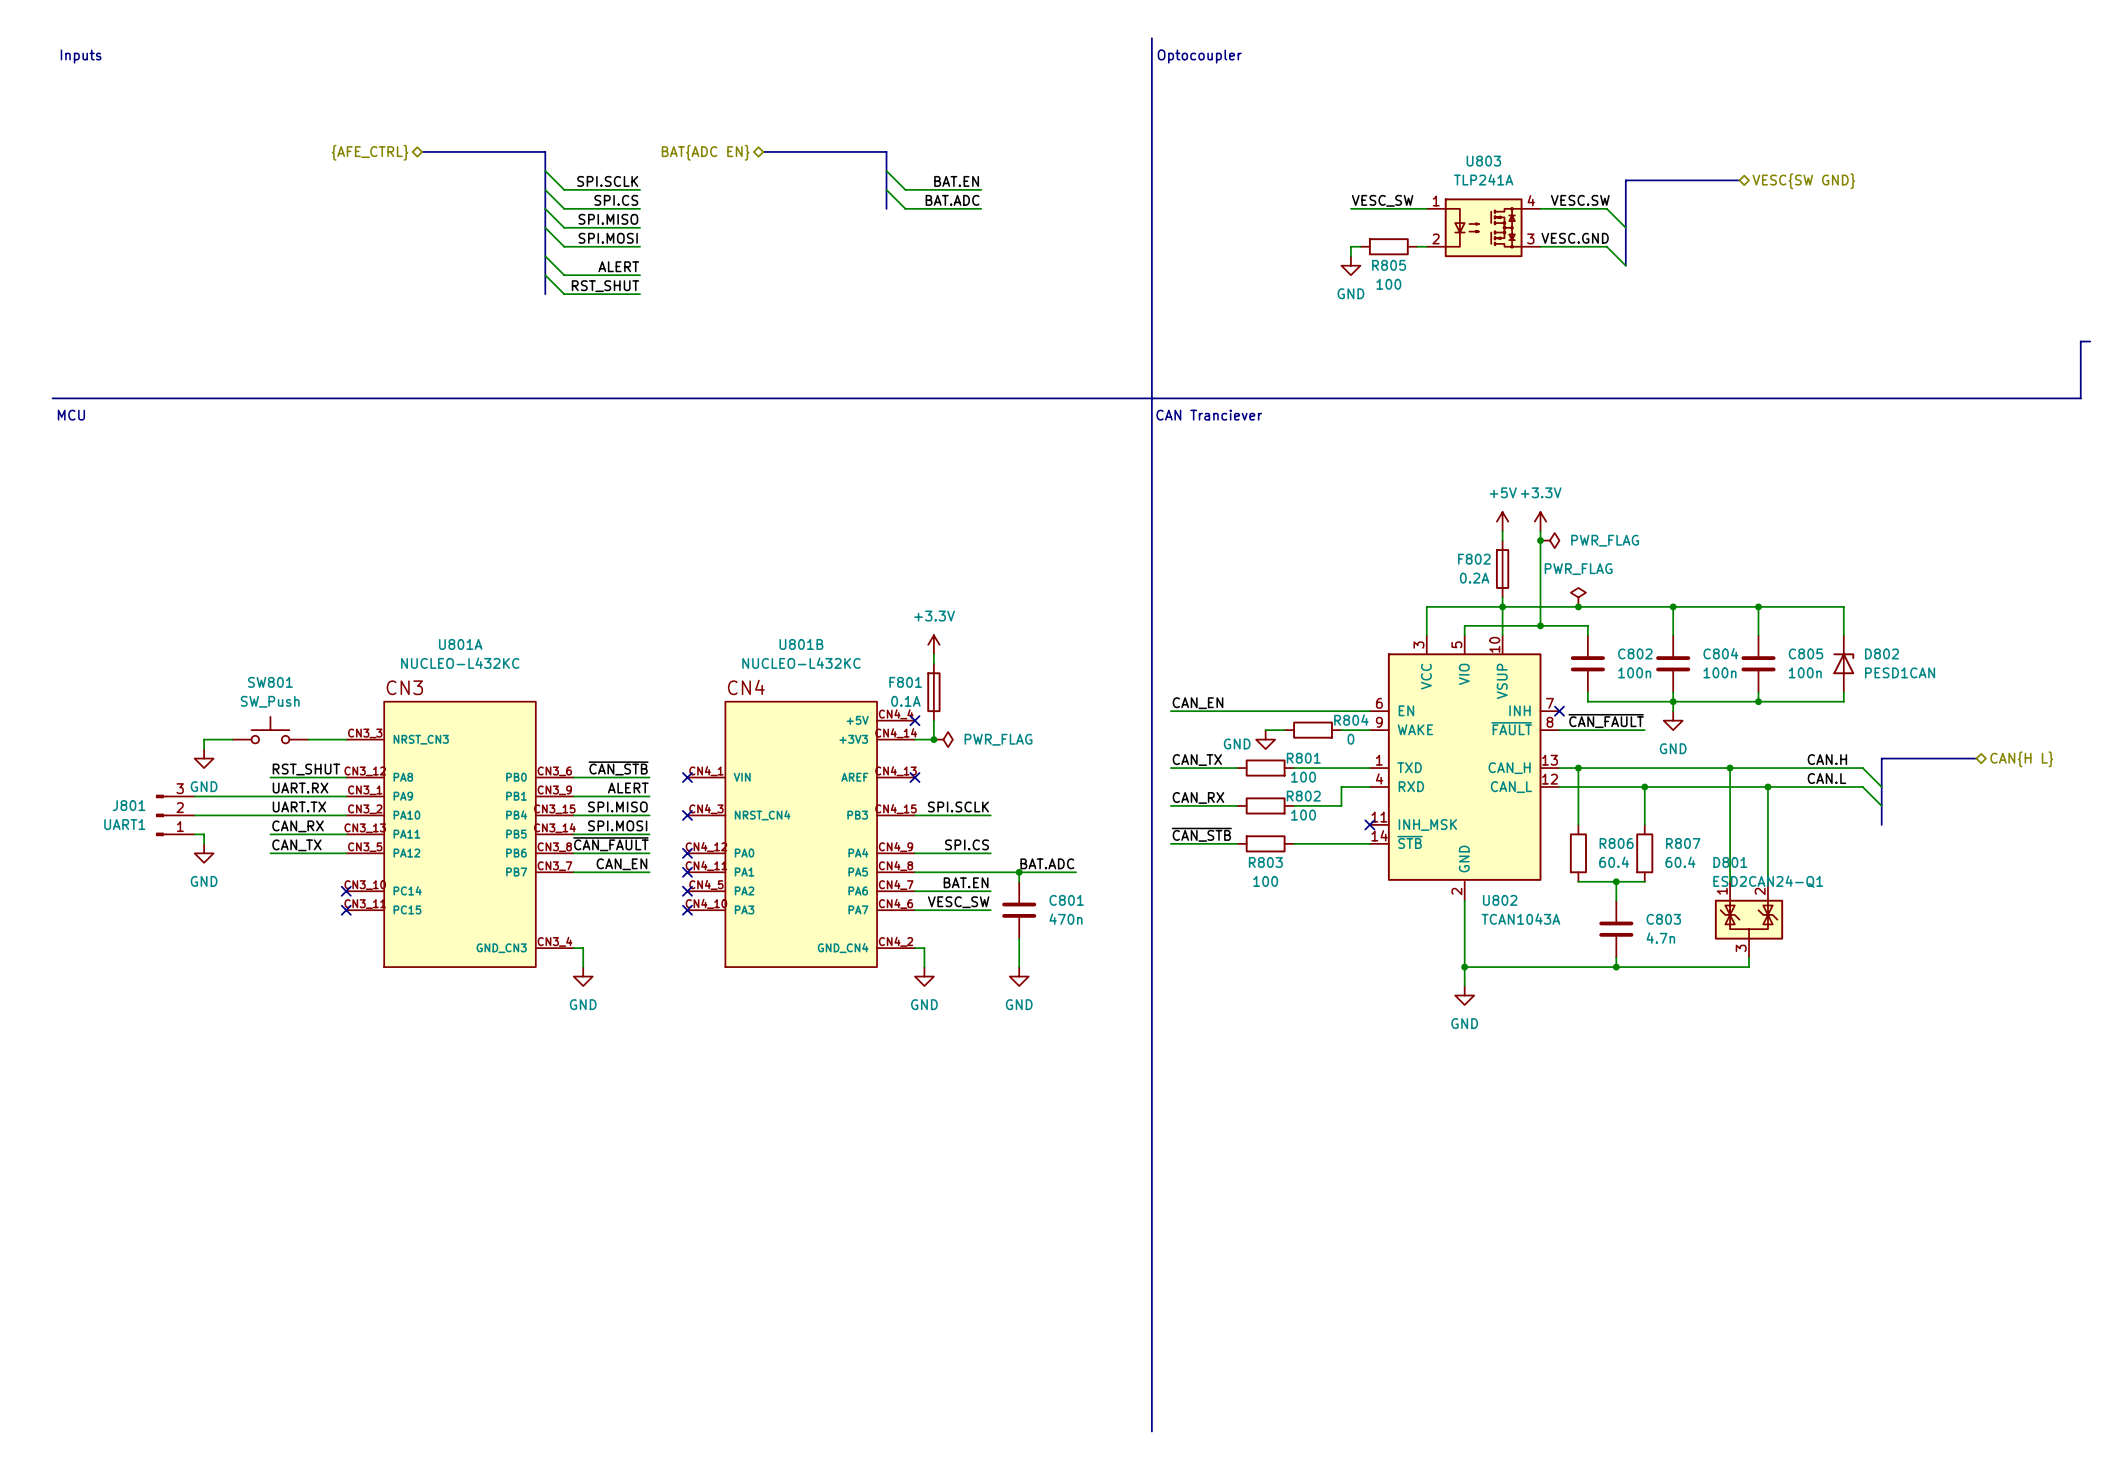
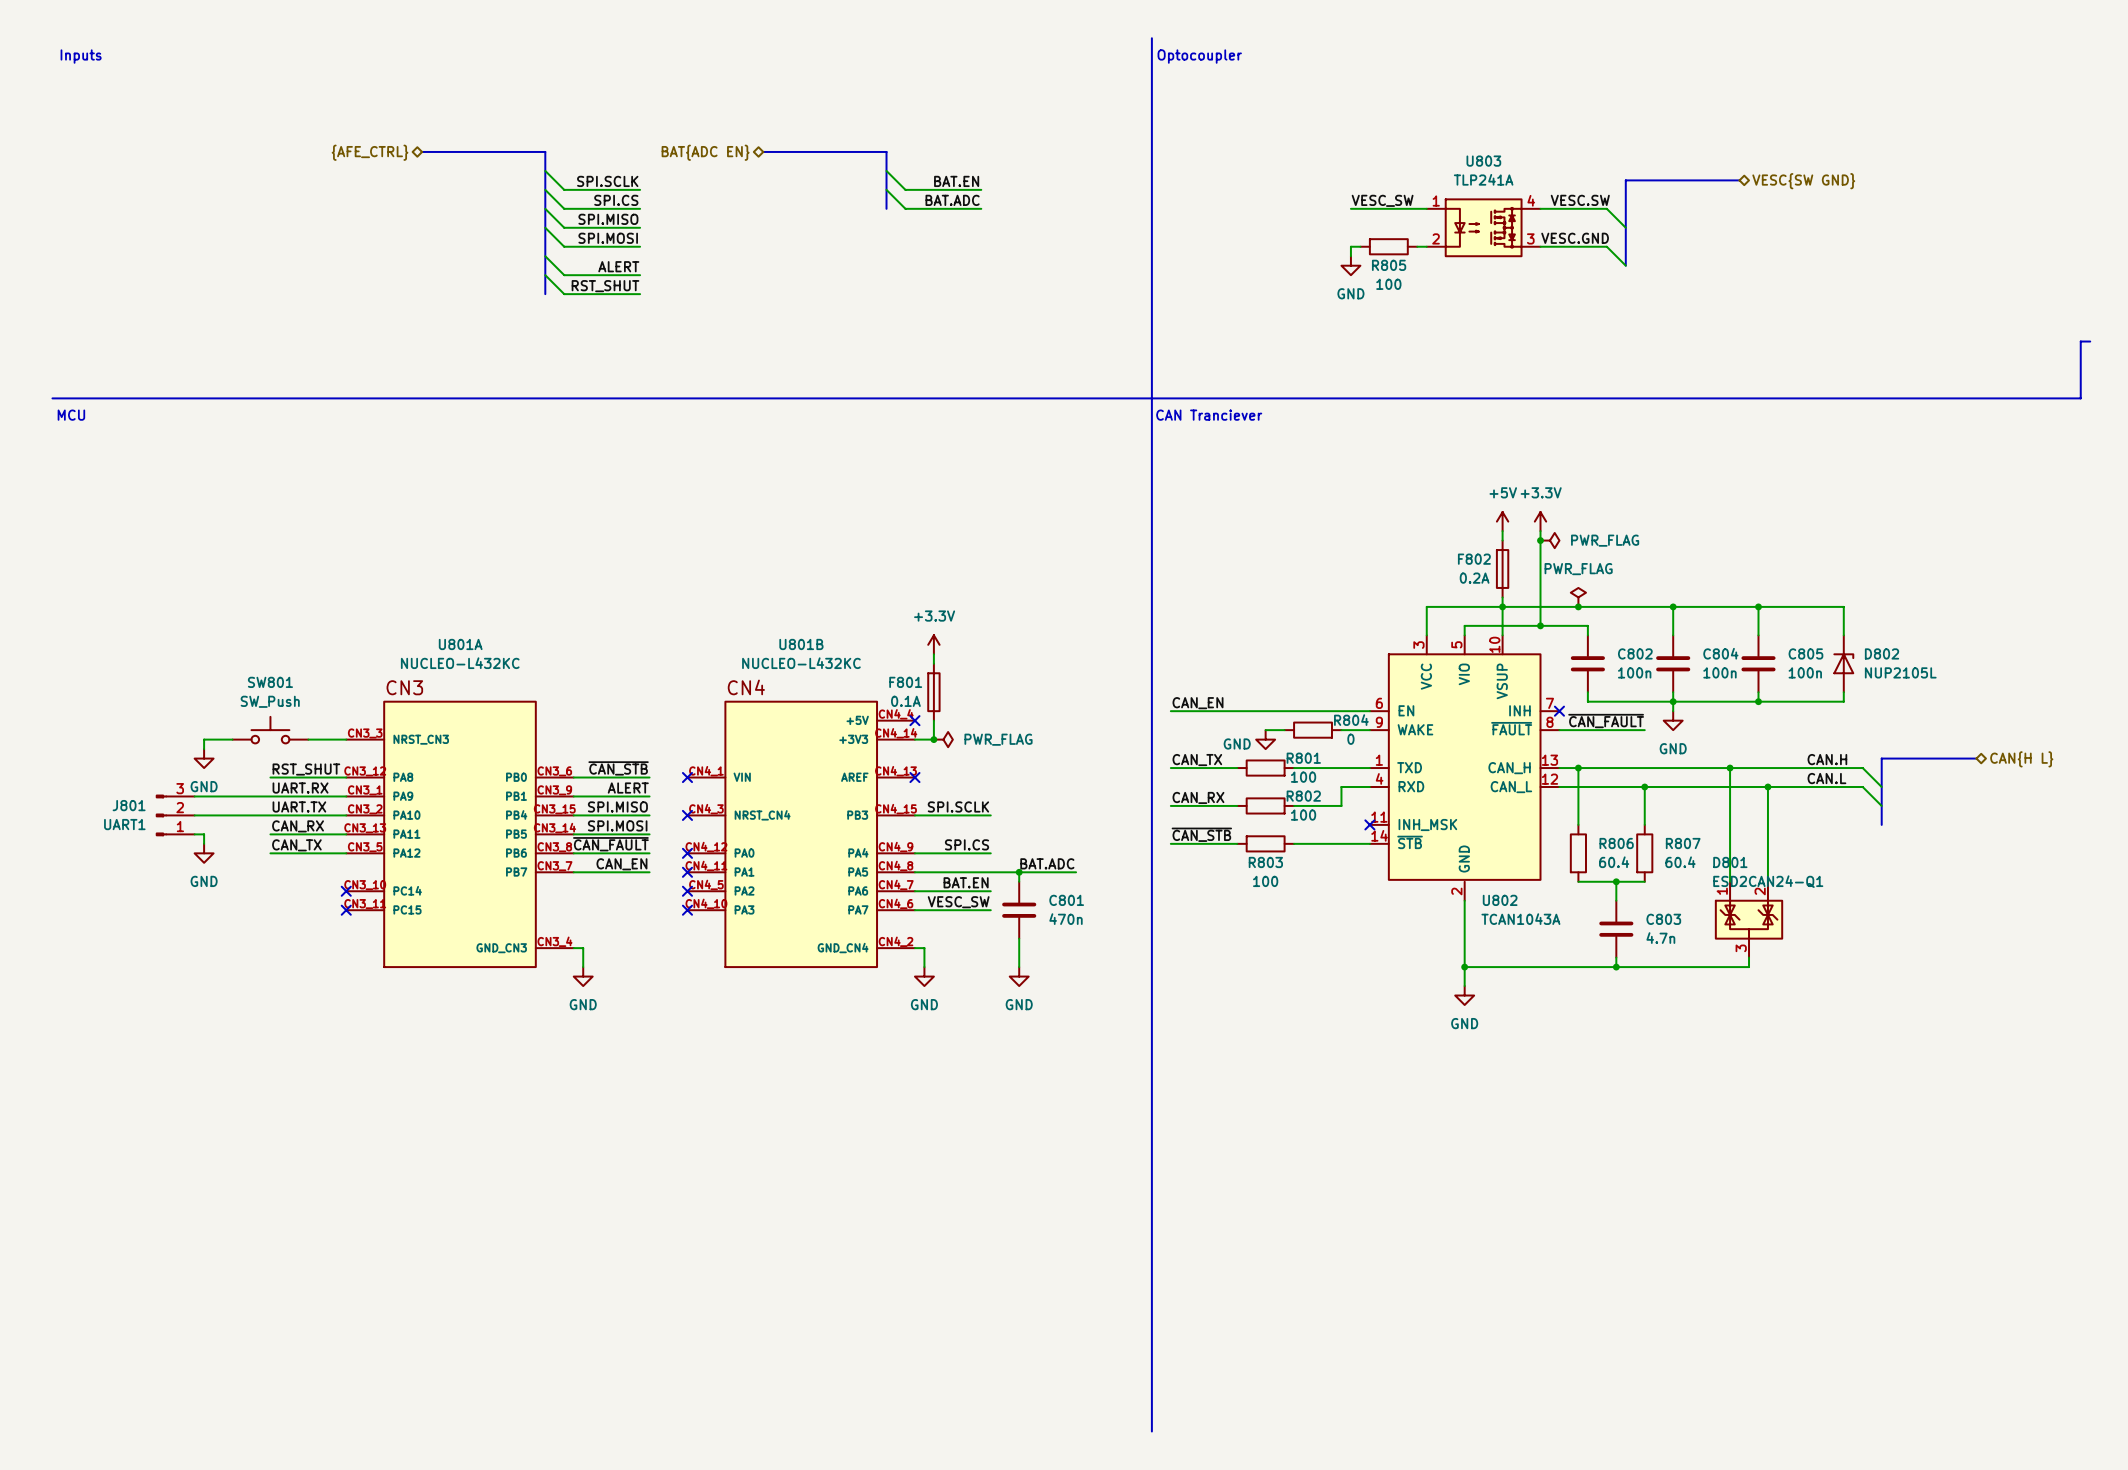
D802 value: PESD1CAN (1900, 672) -> NUP2105L (1900, 672)

